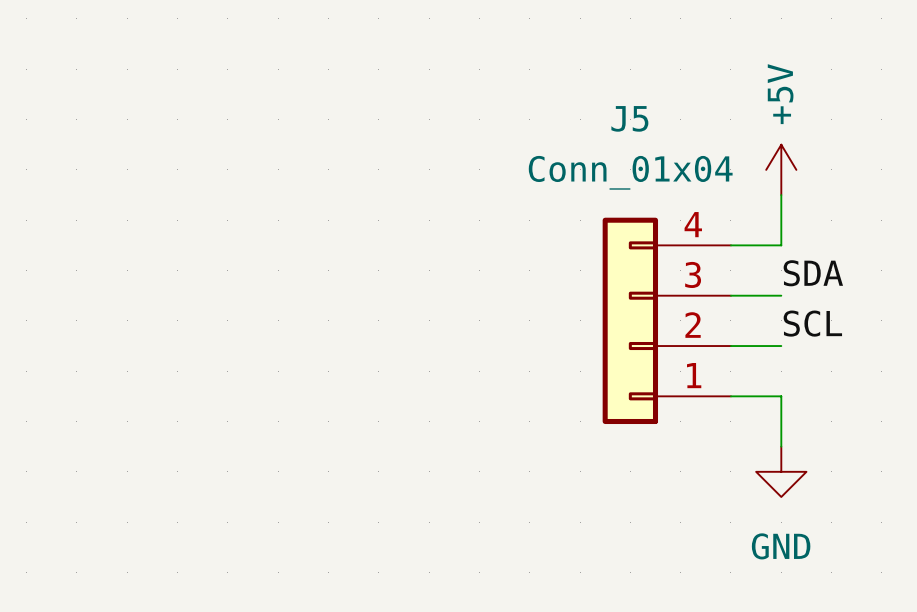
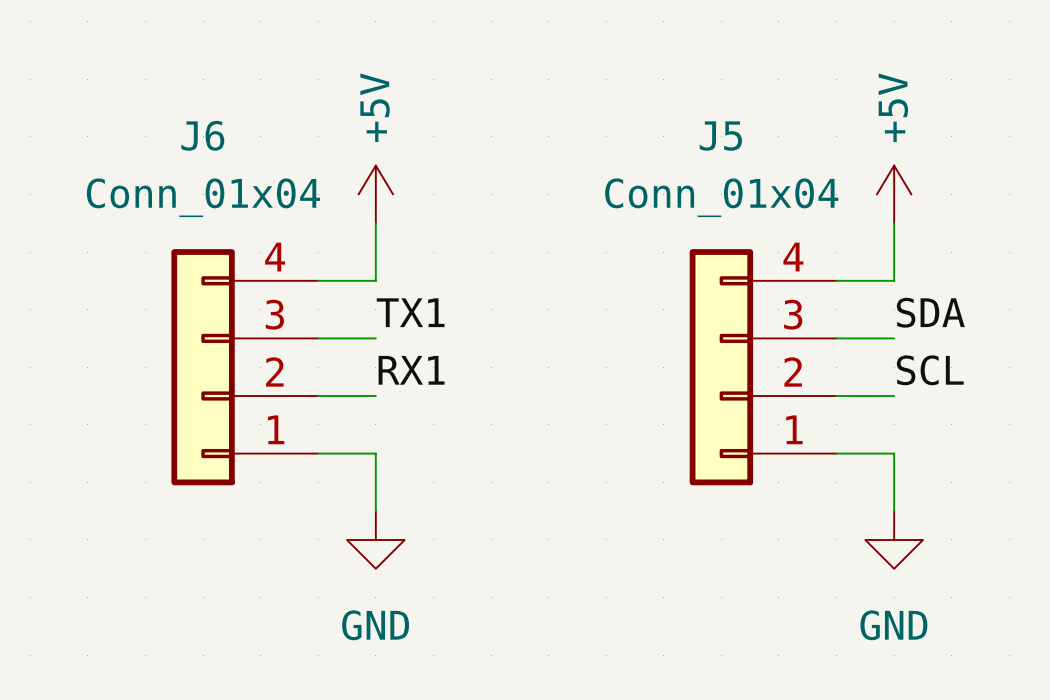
power symbol: none -> +5V (375, 194)
wire: none -> (375, 223) (375, 280) (318, 280)
label: none -> TX1 (410, 312)
wire: none -> (318, 338) (375, 338)
J6: none -> Conn_01x04 (244, 367)
label: none -> RX1 (411, 370)
wire: none -> (318, 395) (375, 395)
wire: none -> (318, 453) (375, 453) (375, 511)
power symbol: none -> GND (375, 539)

